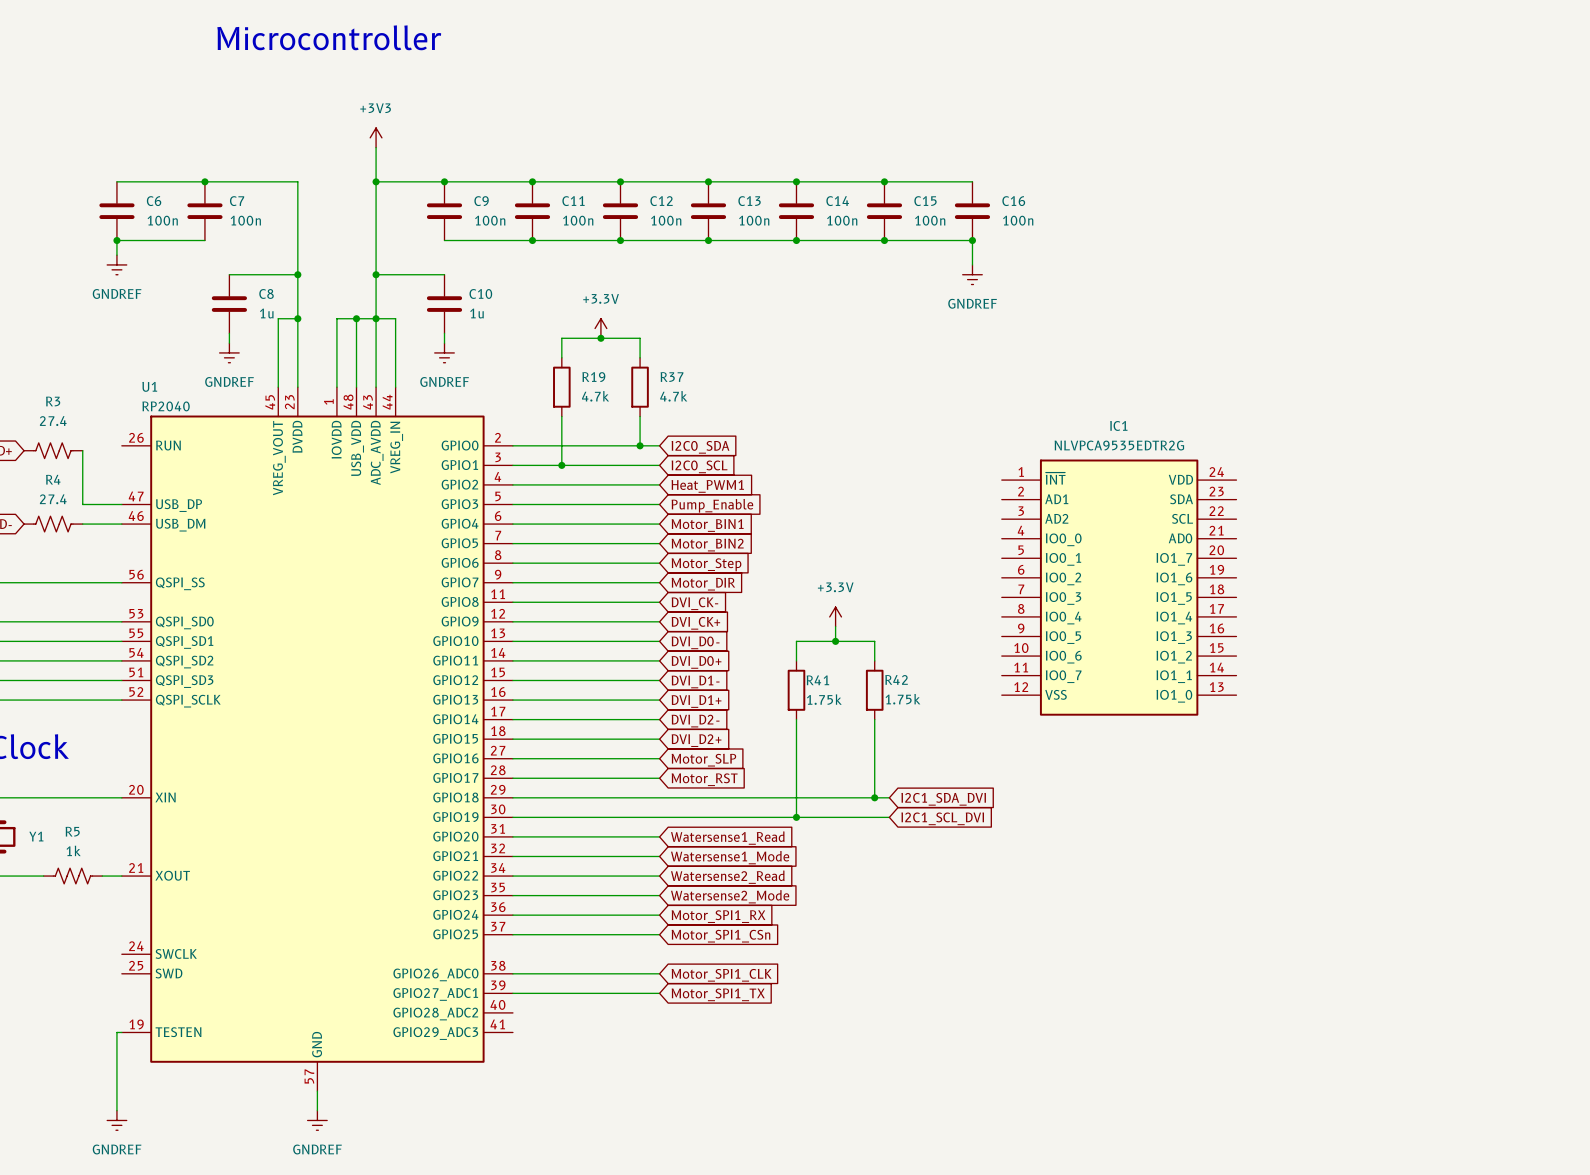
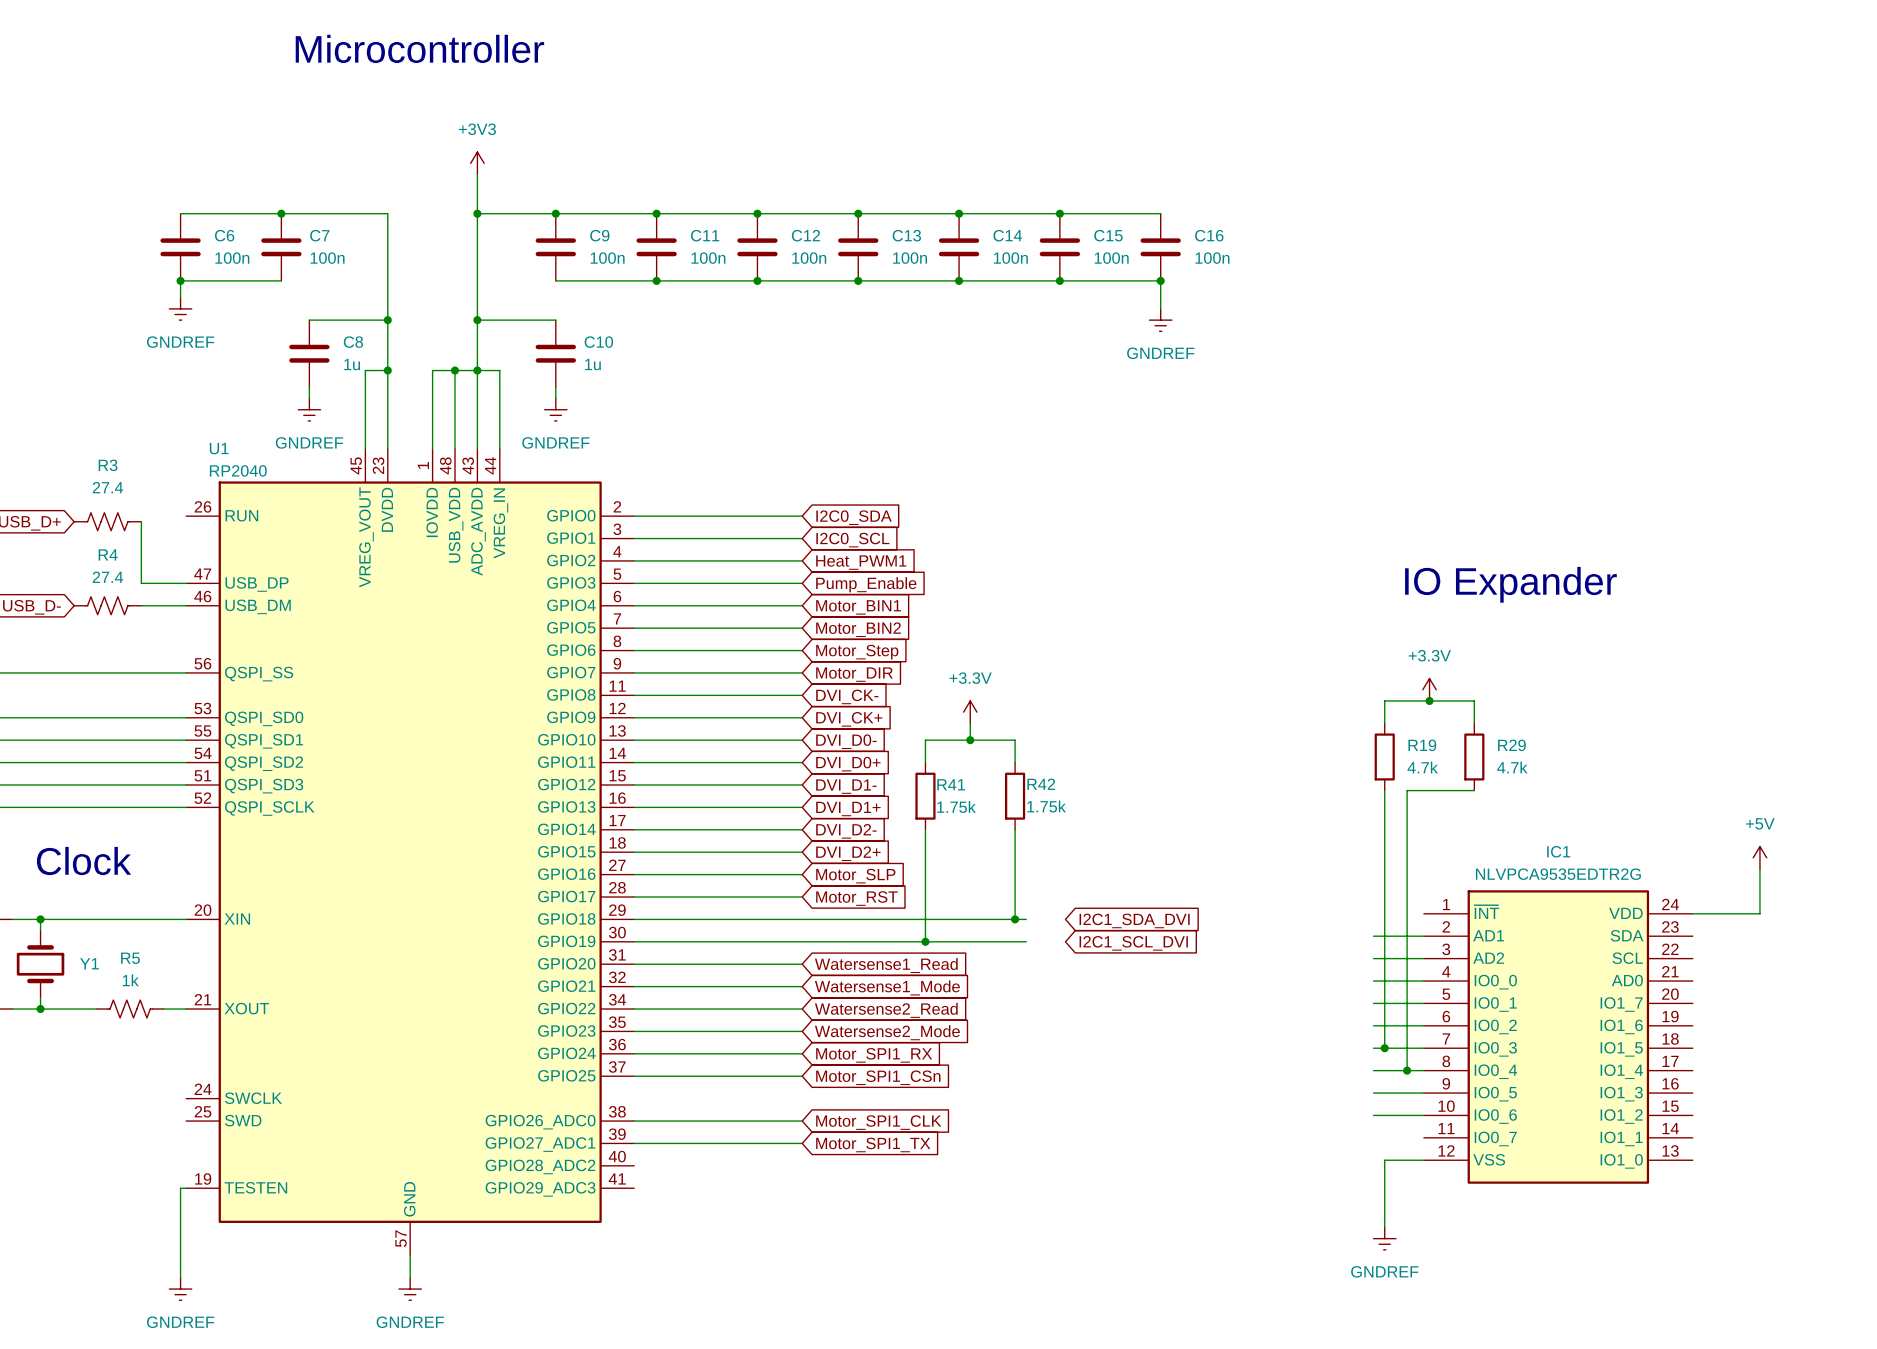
power symbol: +3.3V (600, 328) -> none
junction: (600, 338) -> none
wire: (561, 357) (561, 338) (640, 338) (640, 357) -> none
R19 position: (561, 387) -> (1384, 756)
R37: 4.7k (640, 387) -> none
wire: (561, 416) (561, 465) -> none
wire: (640, 416) (640, 445) -> none
junction: (640, 445) -> none
junction: (561, 465) -> none
text: none -> IO Expander (1510, 584)
IC1 position: (1119, 587) -> (1558, 1037)
power symbol: none -> +3.3V (1429, 689)
junction: none -> (1429, 700)
power symbol position: +3.3V (835, 616) -> +3.3V (970, 712)
wire: (835, 626) (835, 641) -> (970, 723) (970, 740)
wire: none -> (1384, 723) (1384, 700) (1474, 700) (1474, 723)
wire: (796, 641) (796, 660) -> (959, 740) (925, 740) (925, 762)
junction position: (835, 641) -> (970, 740)
wire: (845, 641) (874, 641) (874, 660) -> (1015, 740) (1015, 762)
R29: none -> 4.7k (1474, 756)
wire: none -> (1384, 790) (1384, 1048)
wire: none -> (1474, 790) (1407, 790) (1407, 1070)
R41 position: (796, 690) -> (925, 796)
R42 position: (874, 690) -> (1015, 796)
wire: (796, 719) (796, 817) -> (925, 829) (925, 941)
wire: (874, 719) (874, 797) -> (1015, 829) (1015, 919)
power symbol: none -> +5V (1759, 857)
wire: none -> (1759, 868) (1759, 913) (1692, 913)
junction: none -> (1015, 919)
wire: (855, 797) (889, 797) -> none
junction: (874, 797) -> none
wire: none -> (1373, 936) (1423, 936)
junction: none -> (925, 941)
junction: (796, 817) -> none
wire: (855, 817) (889, 817) -> none
wire: none -> (1373, 958) (1423, 958)
wire: none -> (1373, 981) (1423, 981)
wire: none -> (1373, 1003) (1423, 1003)
wire: none -> (1373, 1025) (1423, 1025)
wire: none -> (1373, 1048) (1423, 1048)
junction: none -> (1384, 1048)
wire: none -> (1373, 1070) (1423, 1070)
junction: none -> (1407, 1070)
wire: none -> (1373, 1093) (1423, 1093)
wire: none -> (1373, 1115) (1423, 1115)
wire: none -> (1423, 1160) (1384, 1160) (1384, 1227)
power symbol: none -> GNDREF (1384, 1238)

